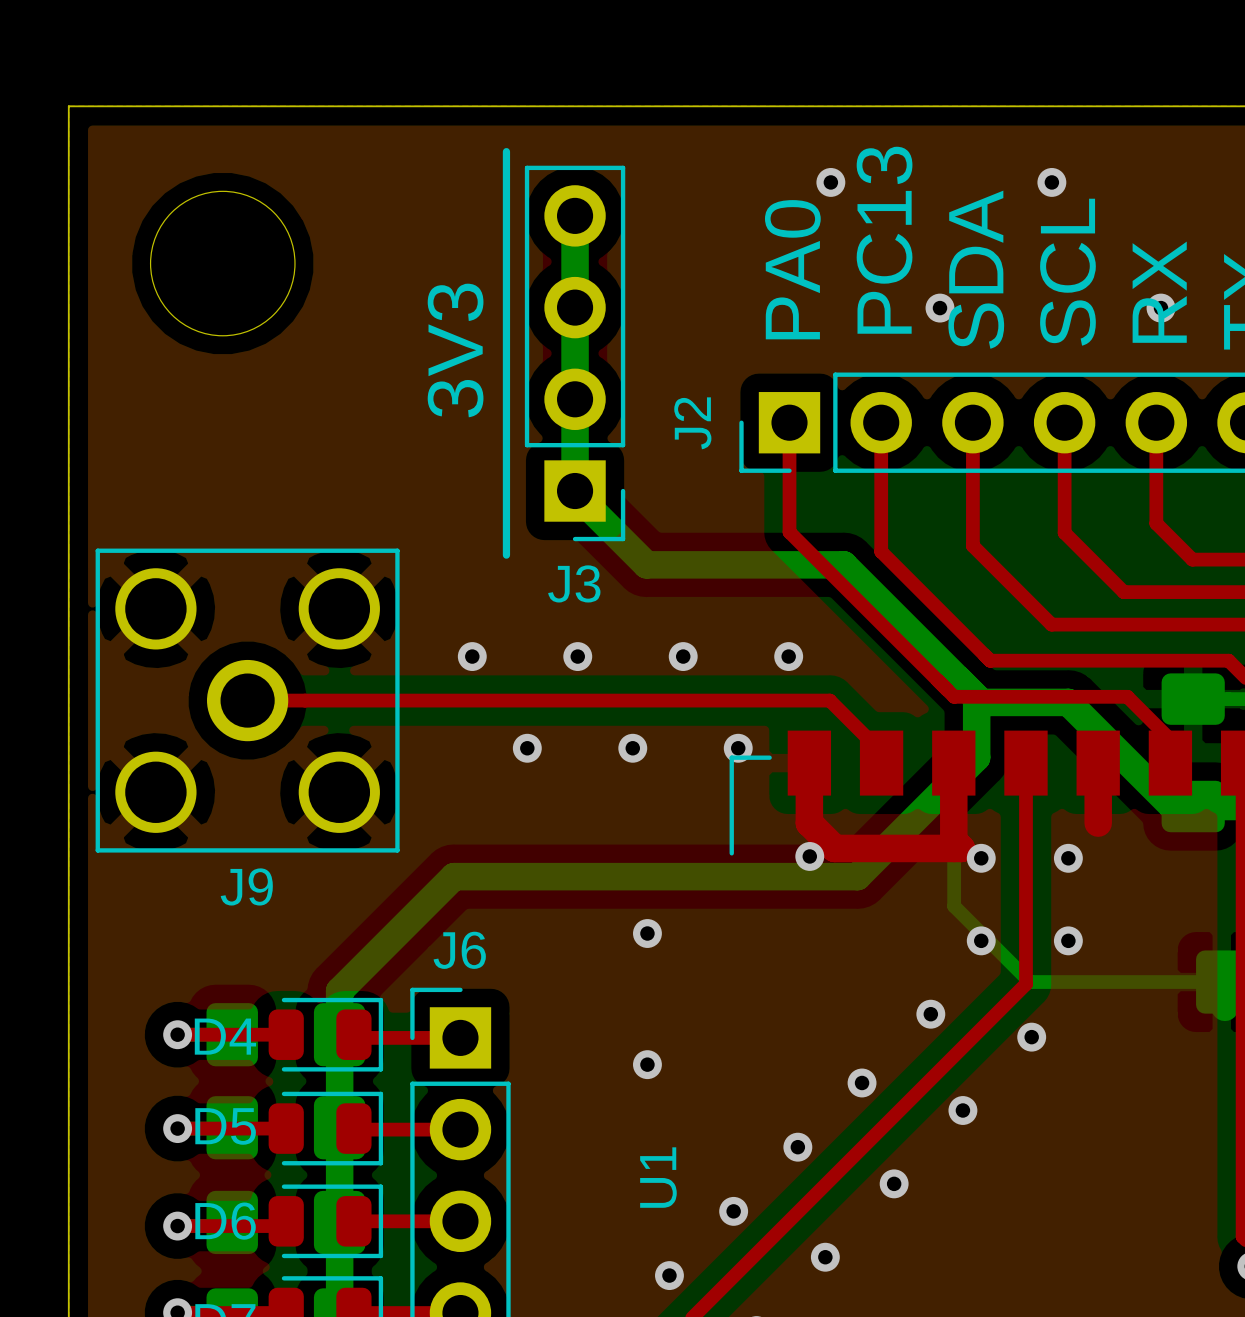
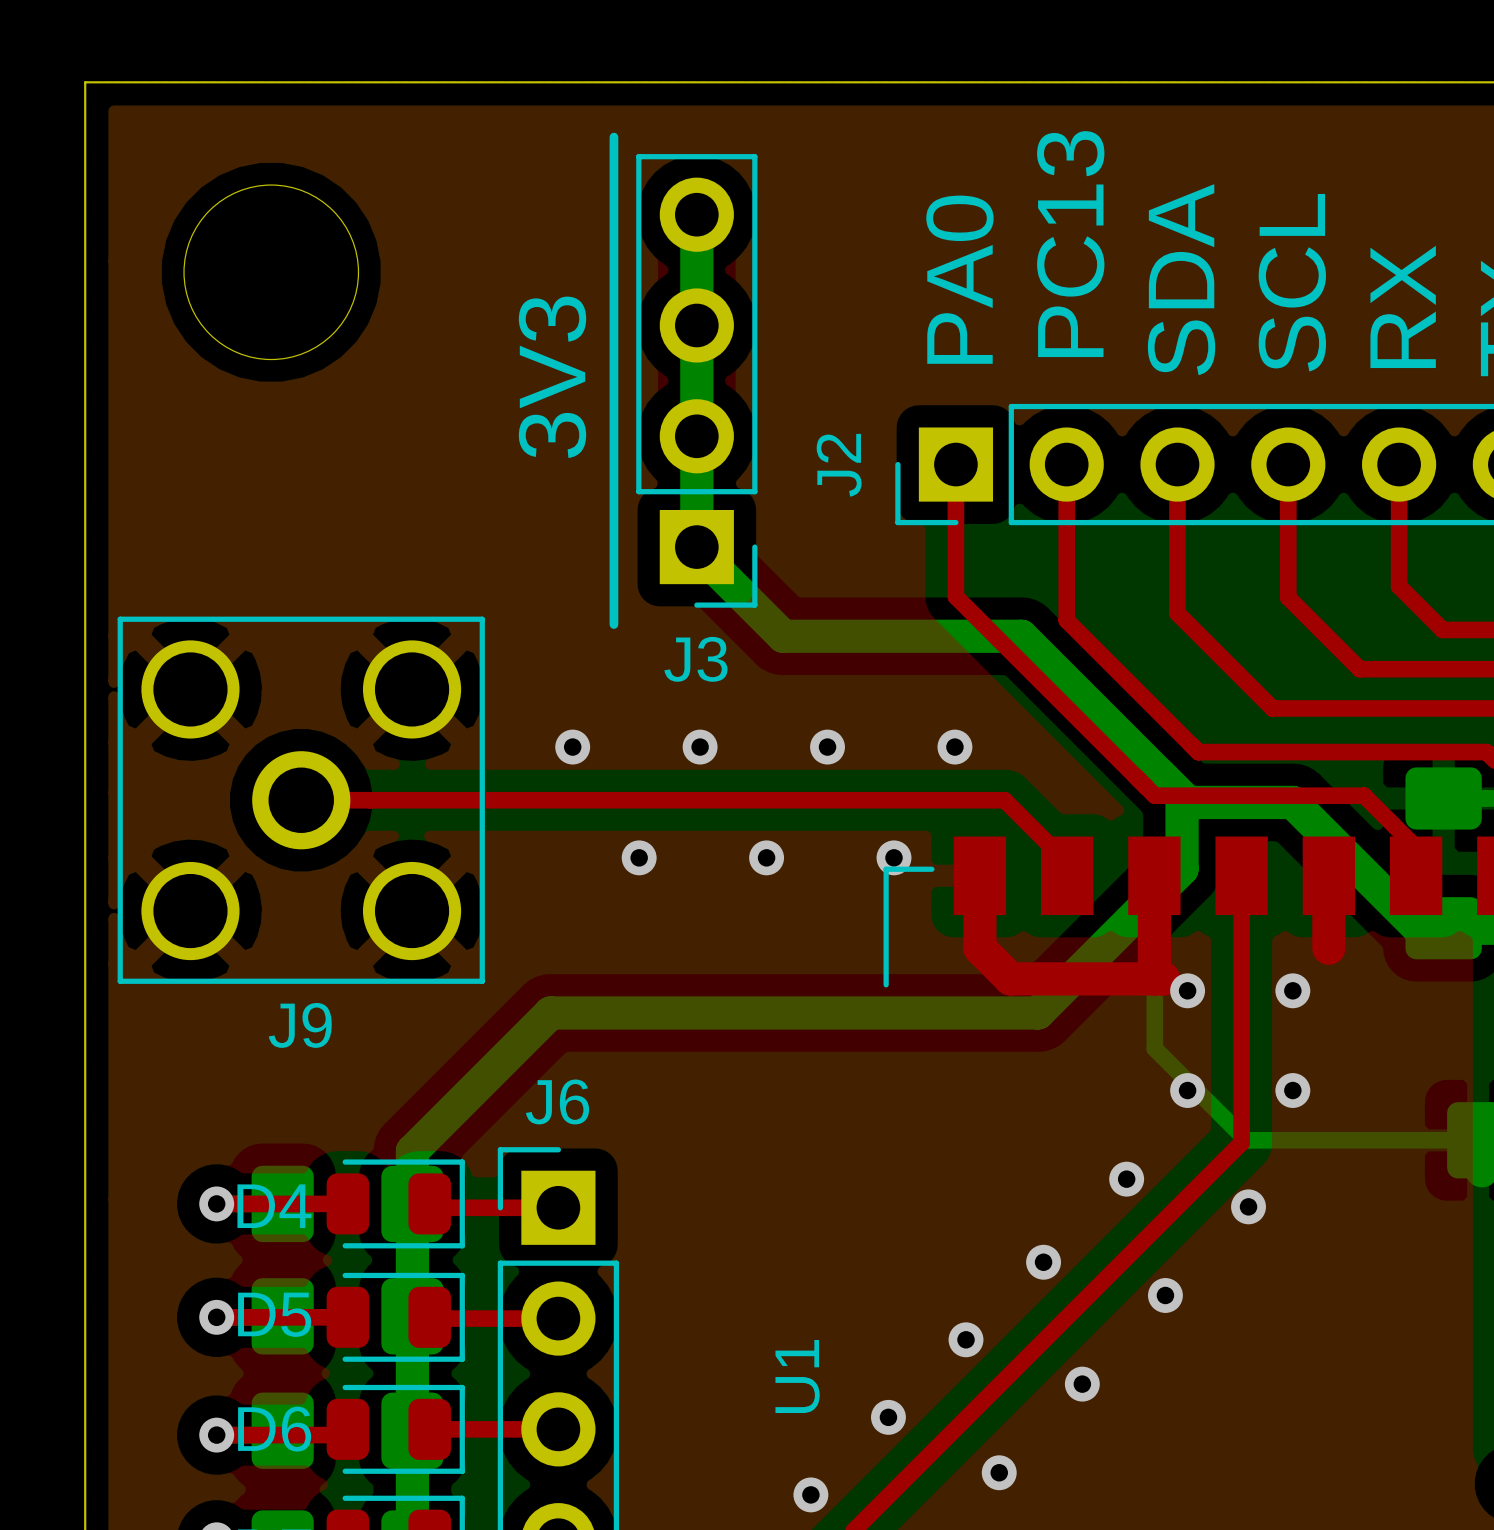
via: (830, 182) -> none
via: (1051, 182) -> none
via: (939, 308) -> none
via: (1161, 308) -> none
via: (809, 856) -> none
via: (647, 933) -> none
via: (647, 1064) -> none

